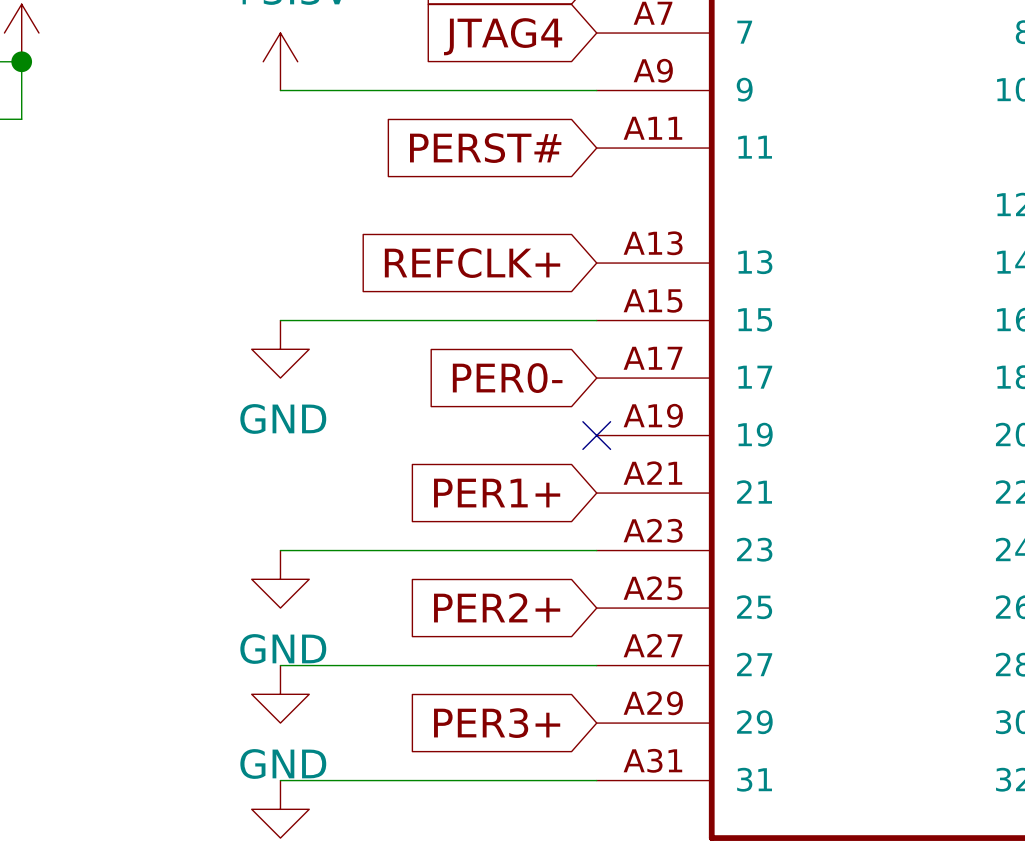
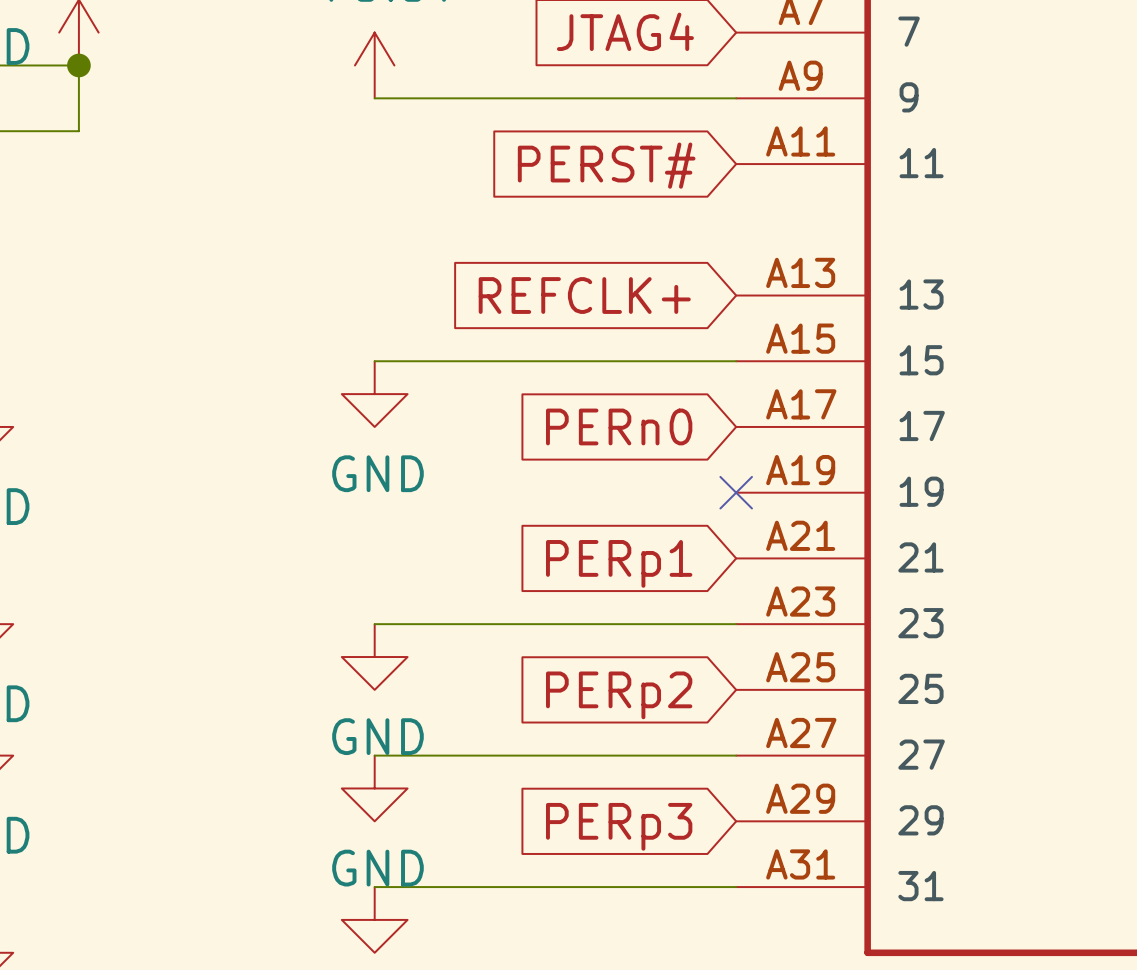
global label: PER0- (507, 378) -> PERn0 (619, 426)
global label: PER1+ (497, 493) -> PERp1 (619, 563)
global label: PER2+ (497, 607) -> PERp2 (619, 695)
global label: PER3+ (497, 723) -> PERp3 (619, 826)

